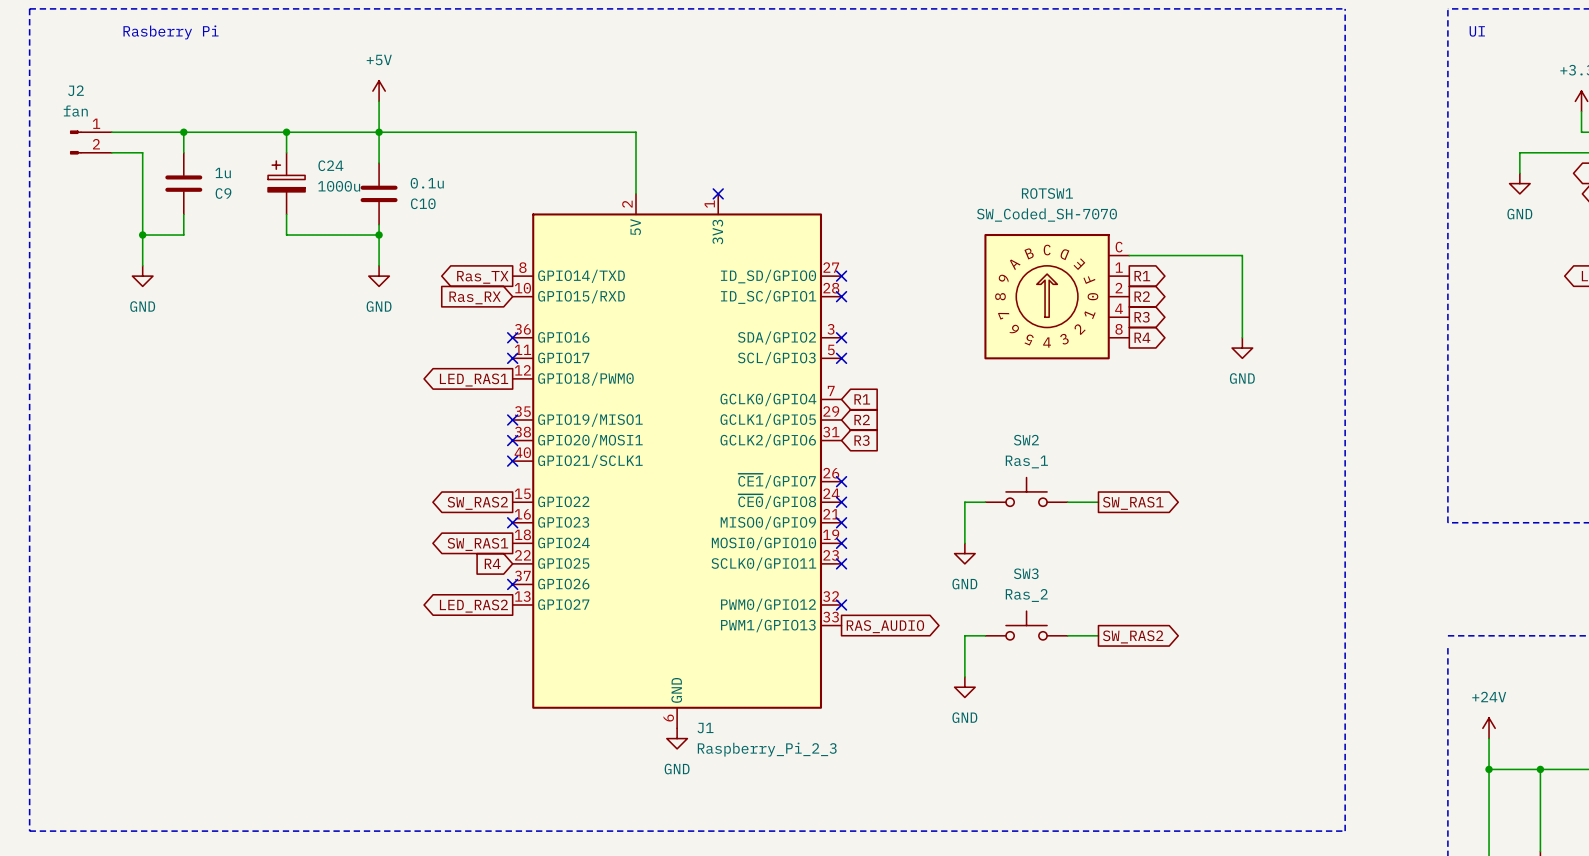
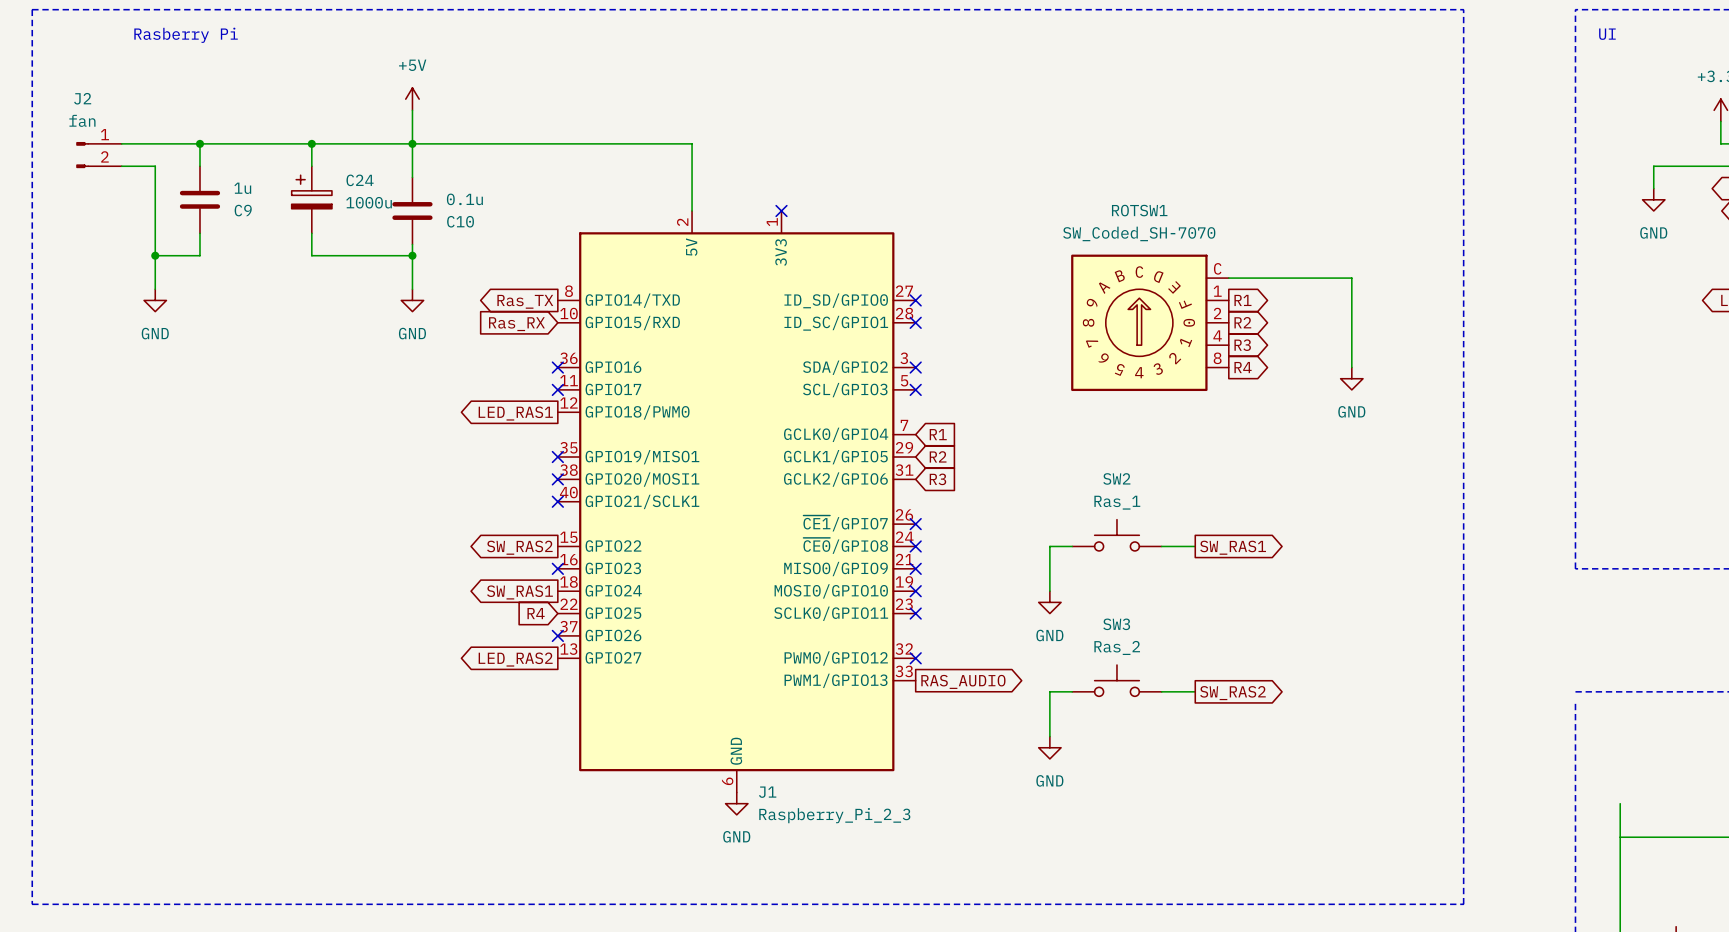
power symbol: +24V (1489, 728) -> none
junction: (1489, 769) -> none
wire: (1540, 769) (1540, 851) -> none
junction: (1540, 769) -> none

